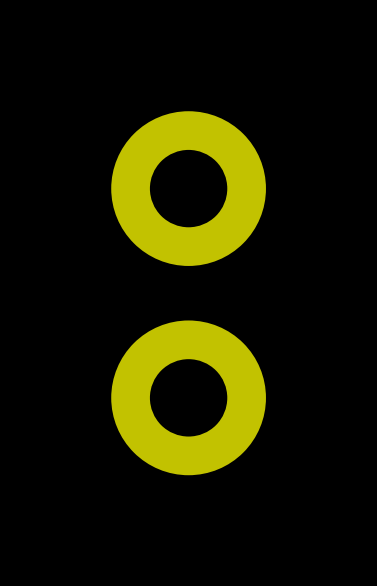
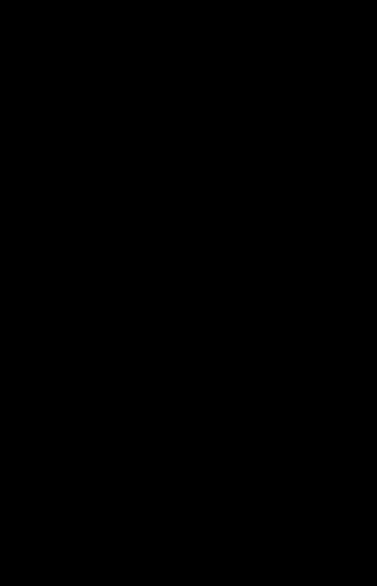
part: (188, 188) -> none
part: (188, 397) -> none

